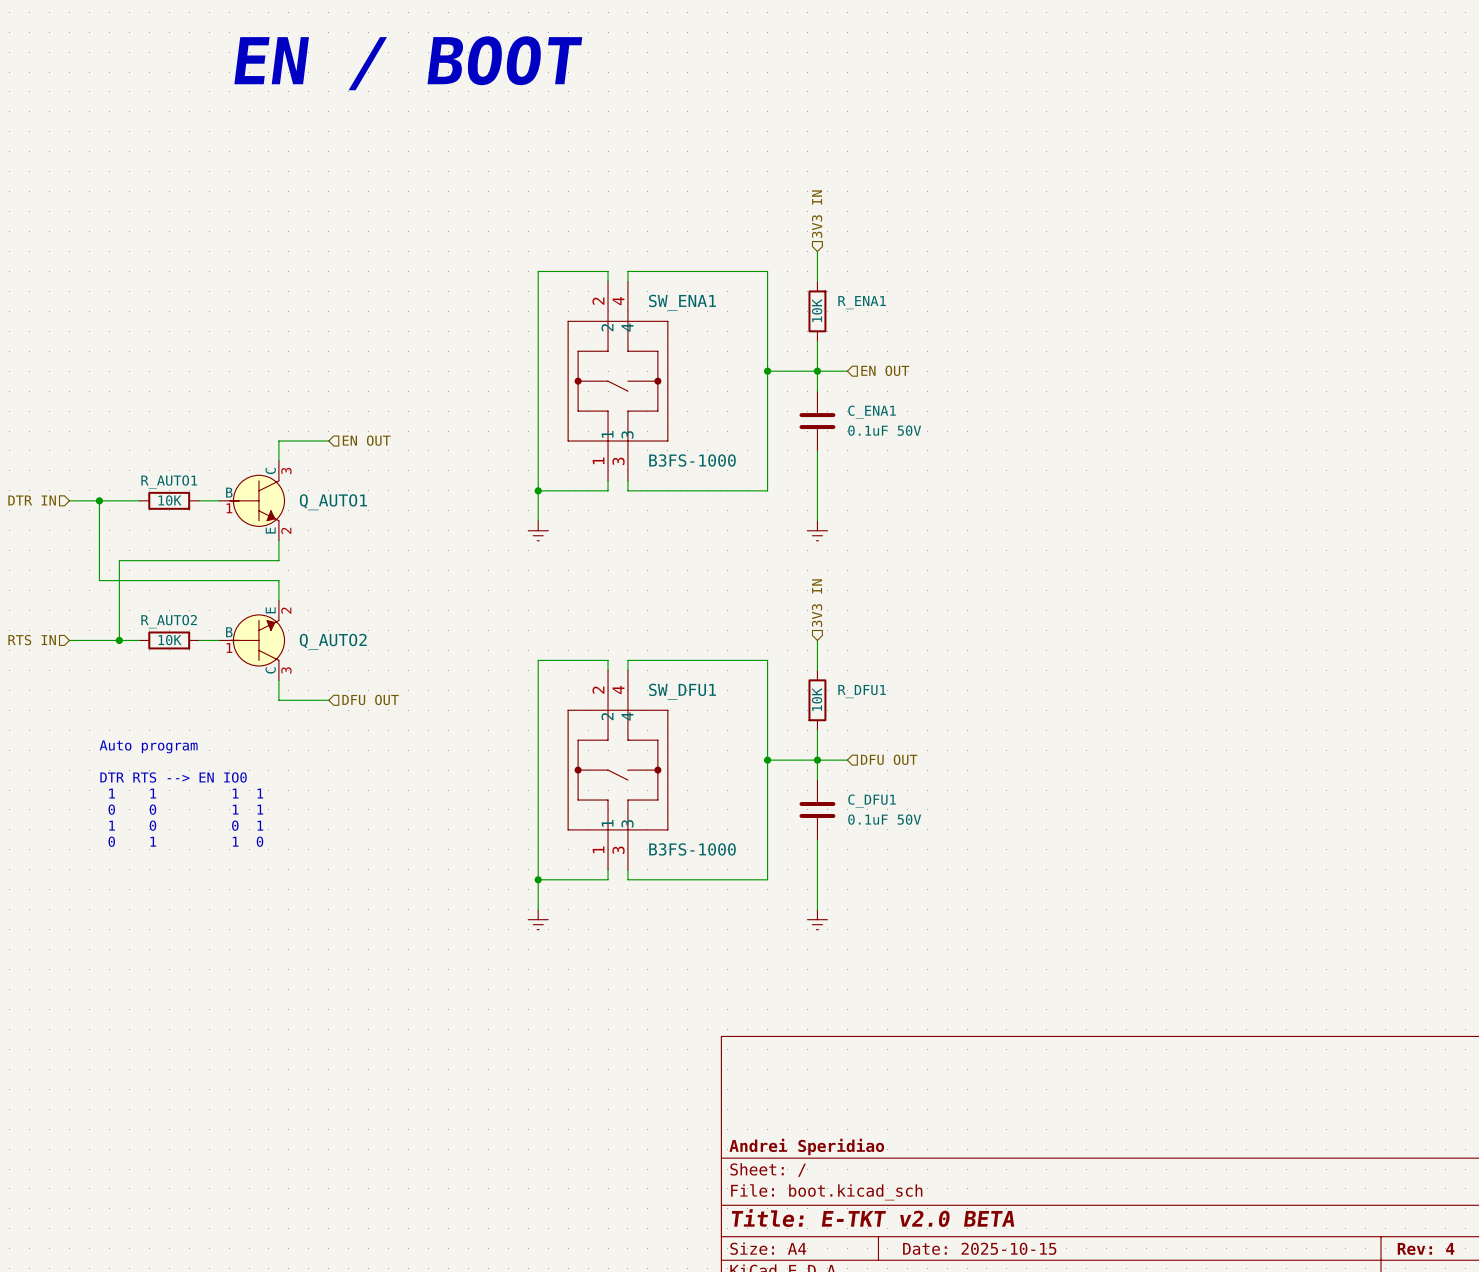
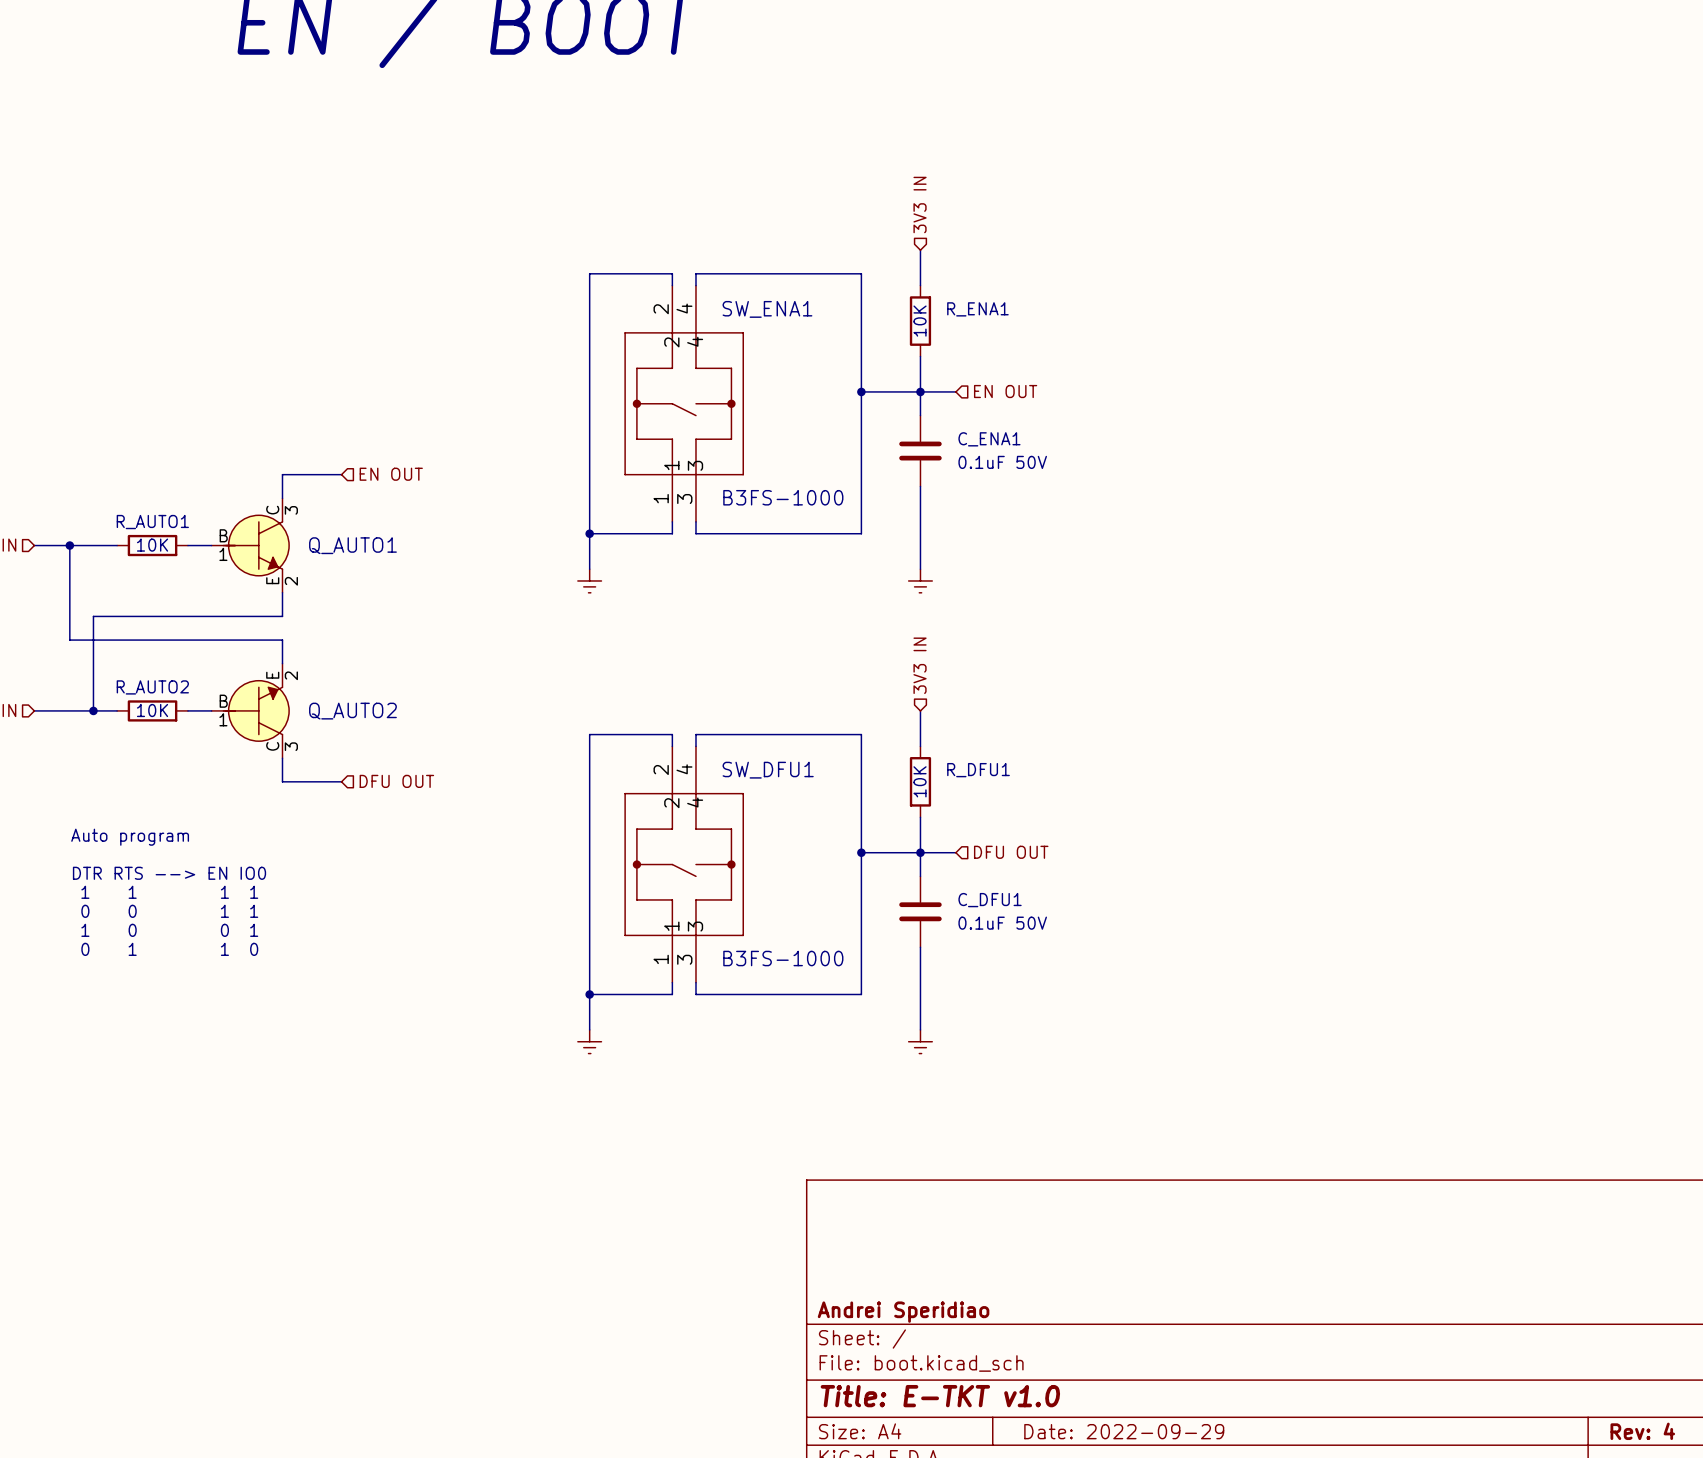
title block: Title: E-TKT v2.0 BETA (873, 1218) -> Title: E-TKT v1.0 (940, 1396)
title block: Date: 2025-10-15 (979, 1248) -> Date: 2022-09-29 (1124, 1431)

